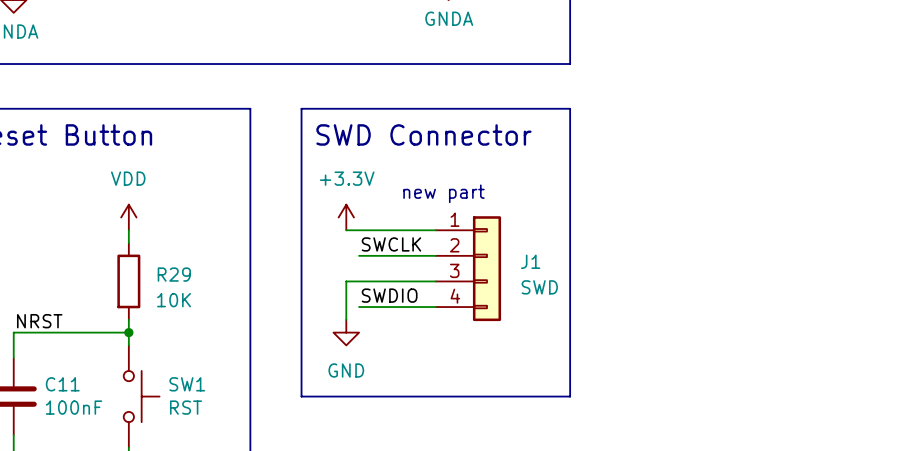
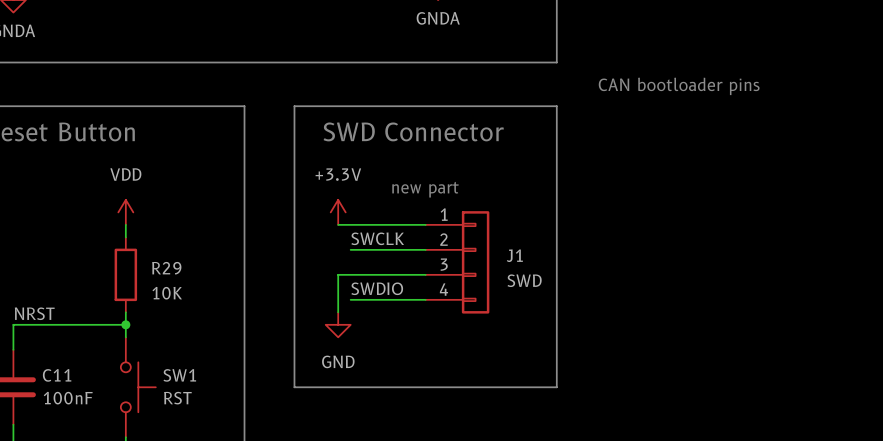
text: none -> CAN bootloader pins (679, 86)

